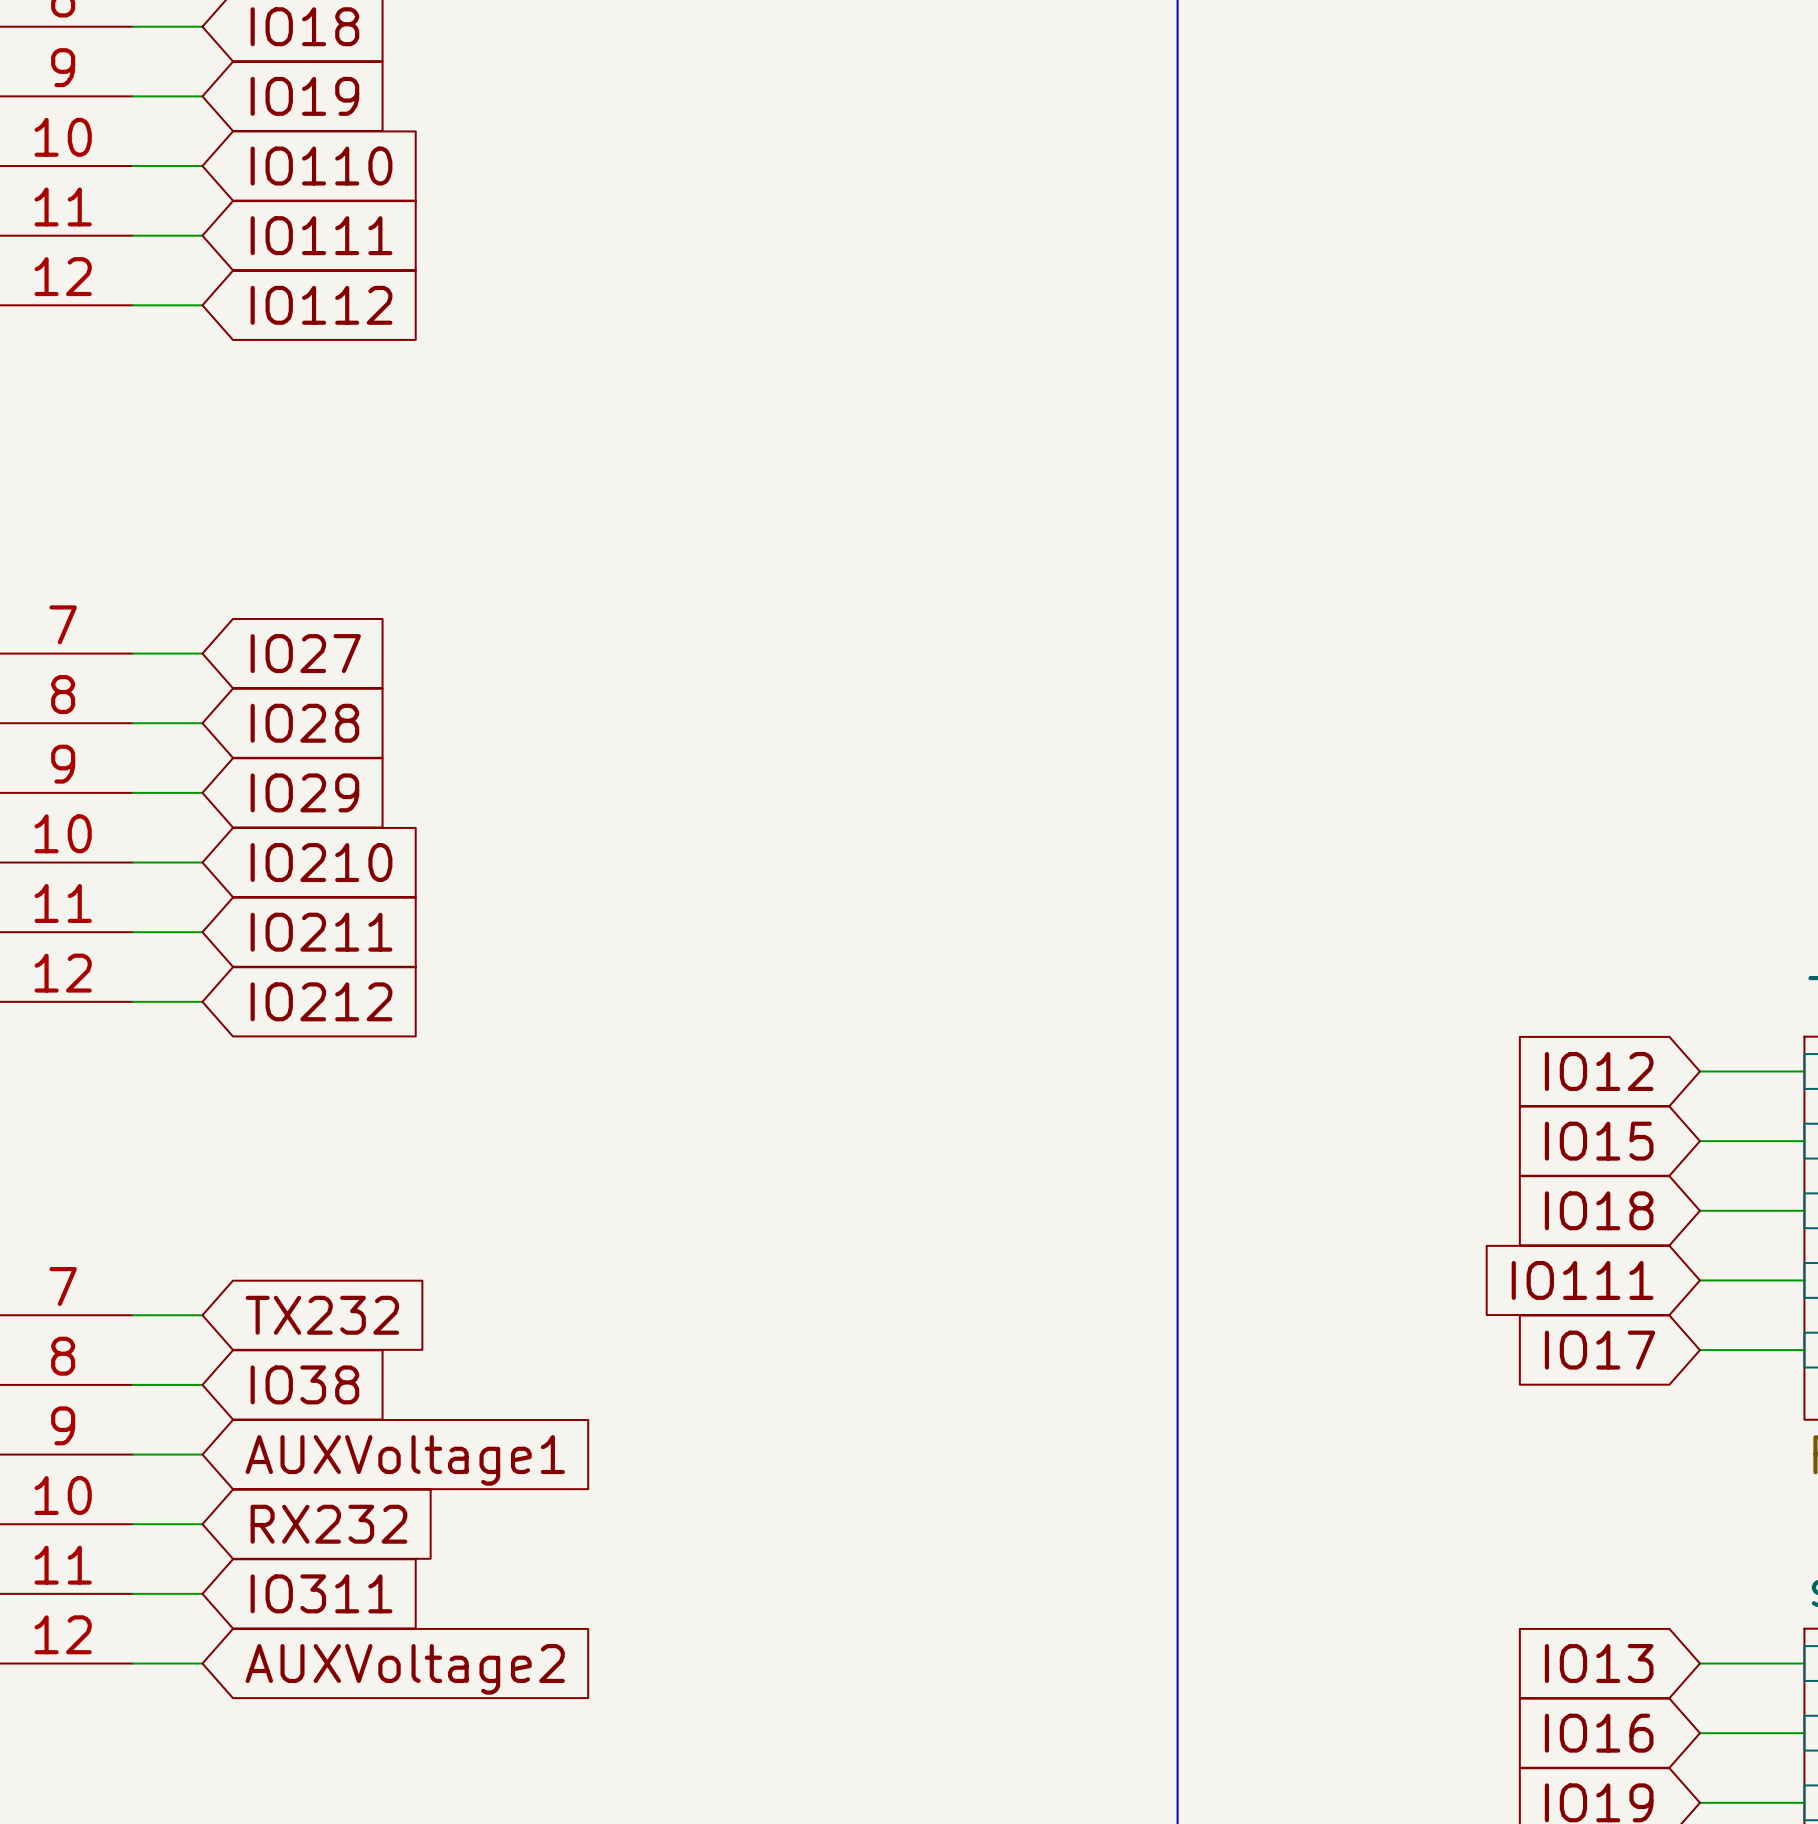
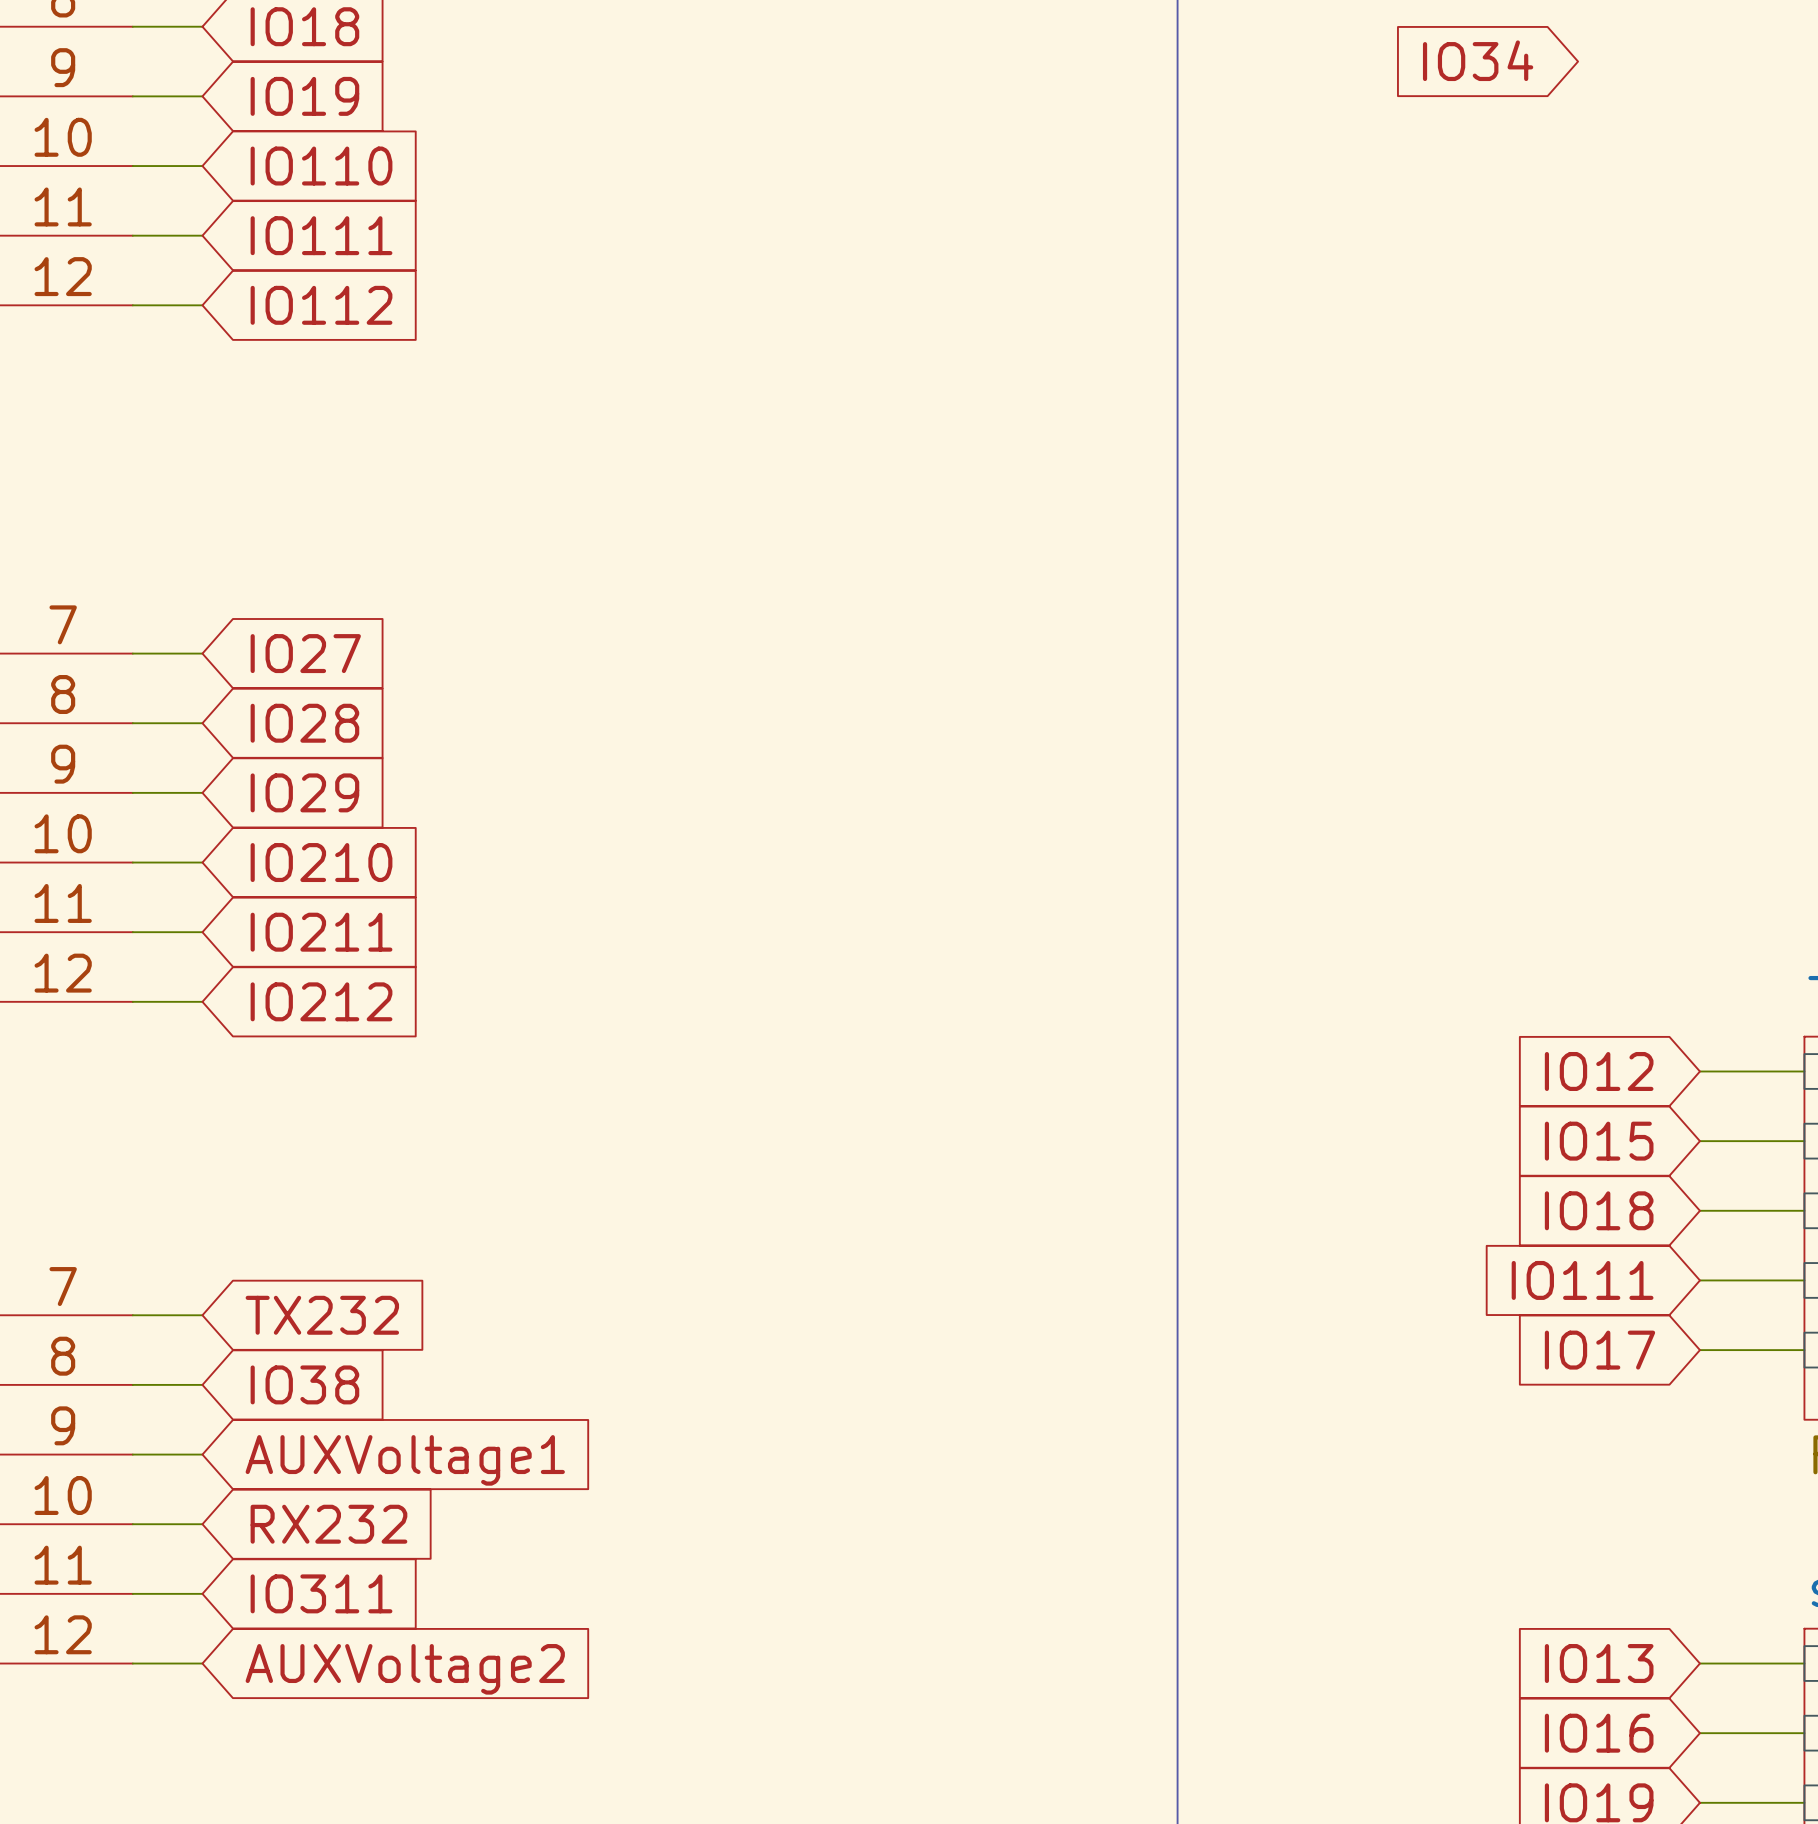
global label: none -> IO34 (1478, 60)

